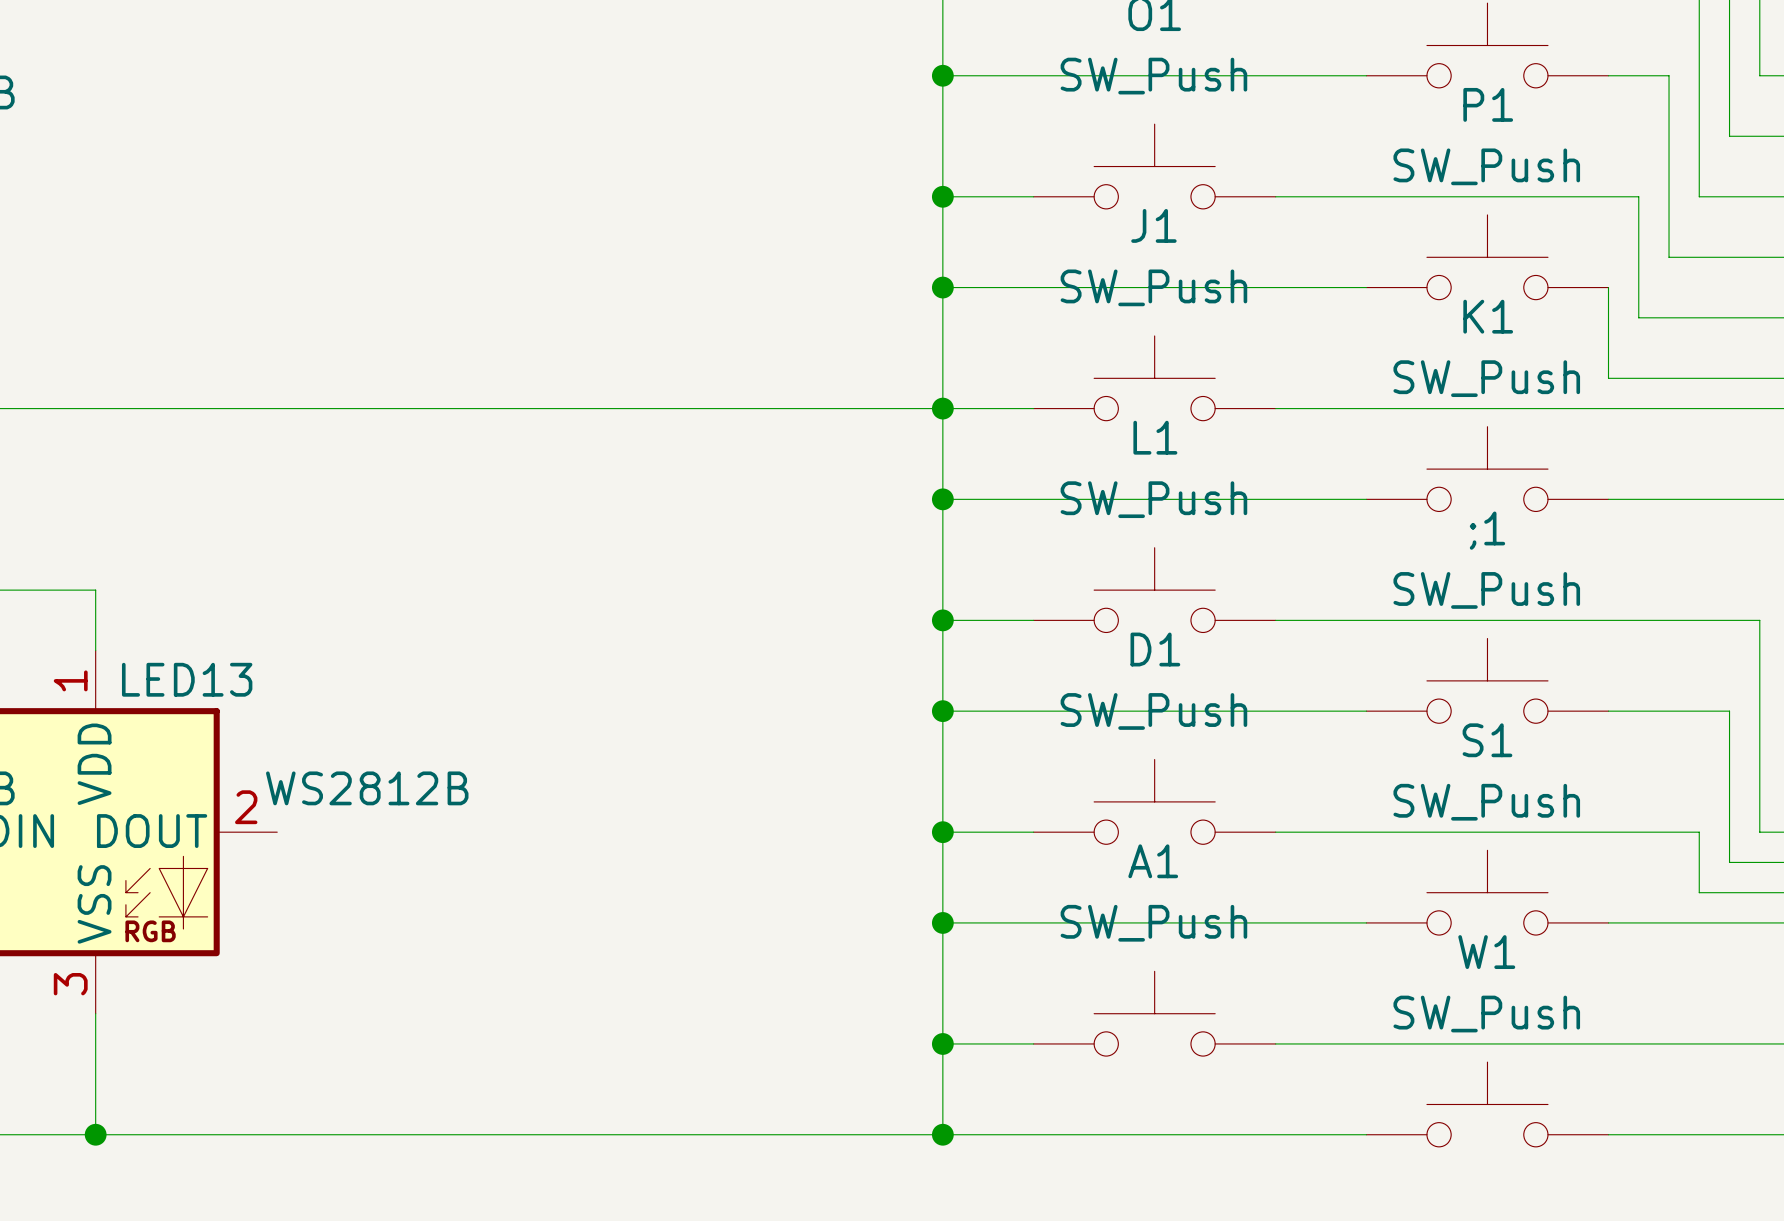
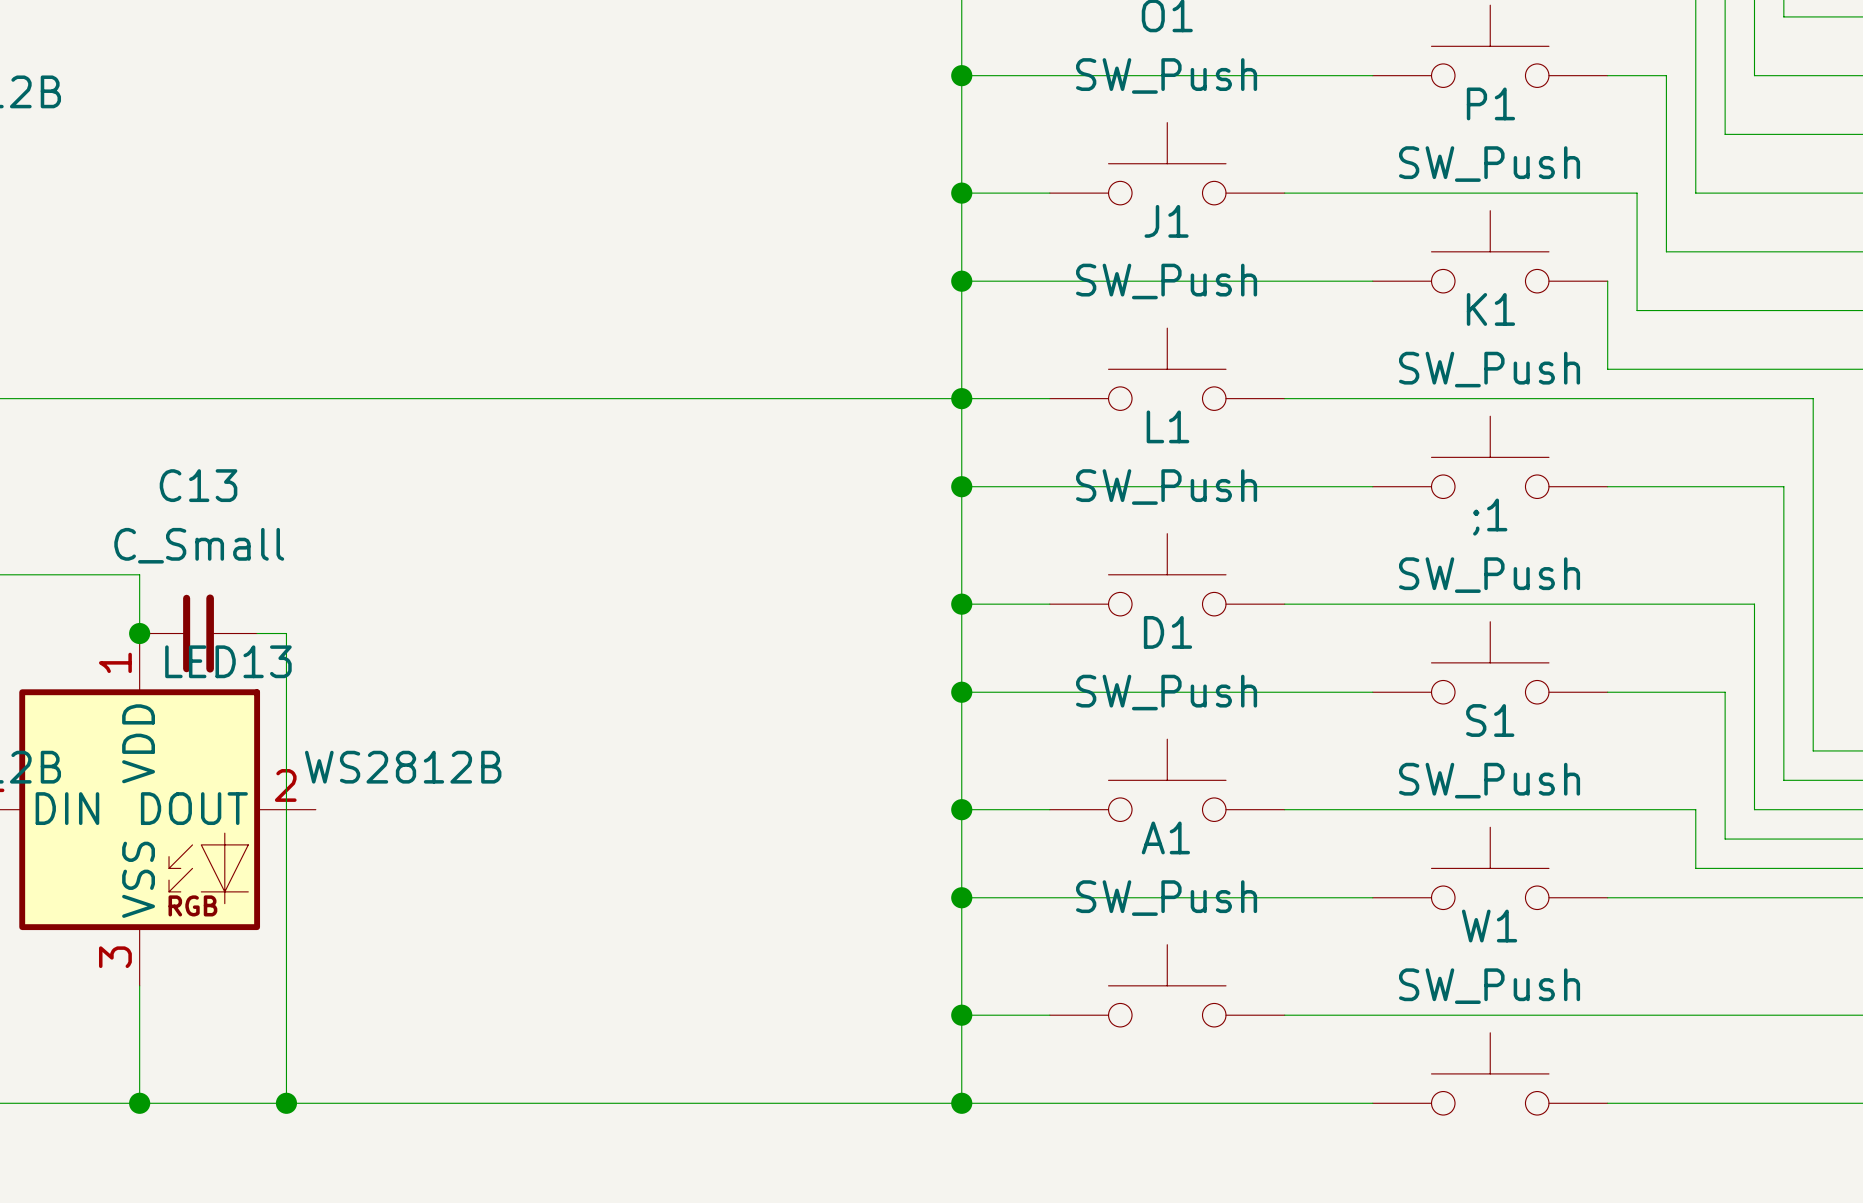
junction: none -> (139, 633)
C13: none -> C_Small (198, 633)
wire: none -> (257, 633) (286, 633) (286, 1103)
junction: none -> (286, 1103)

